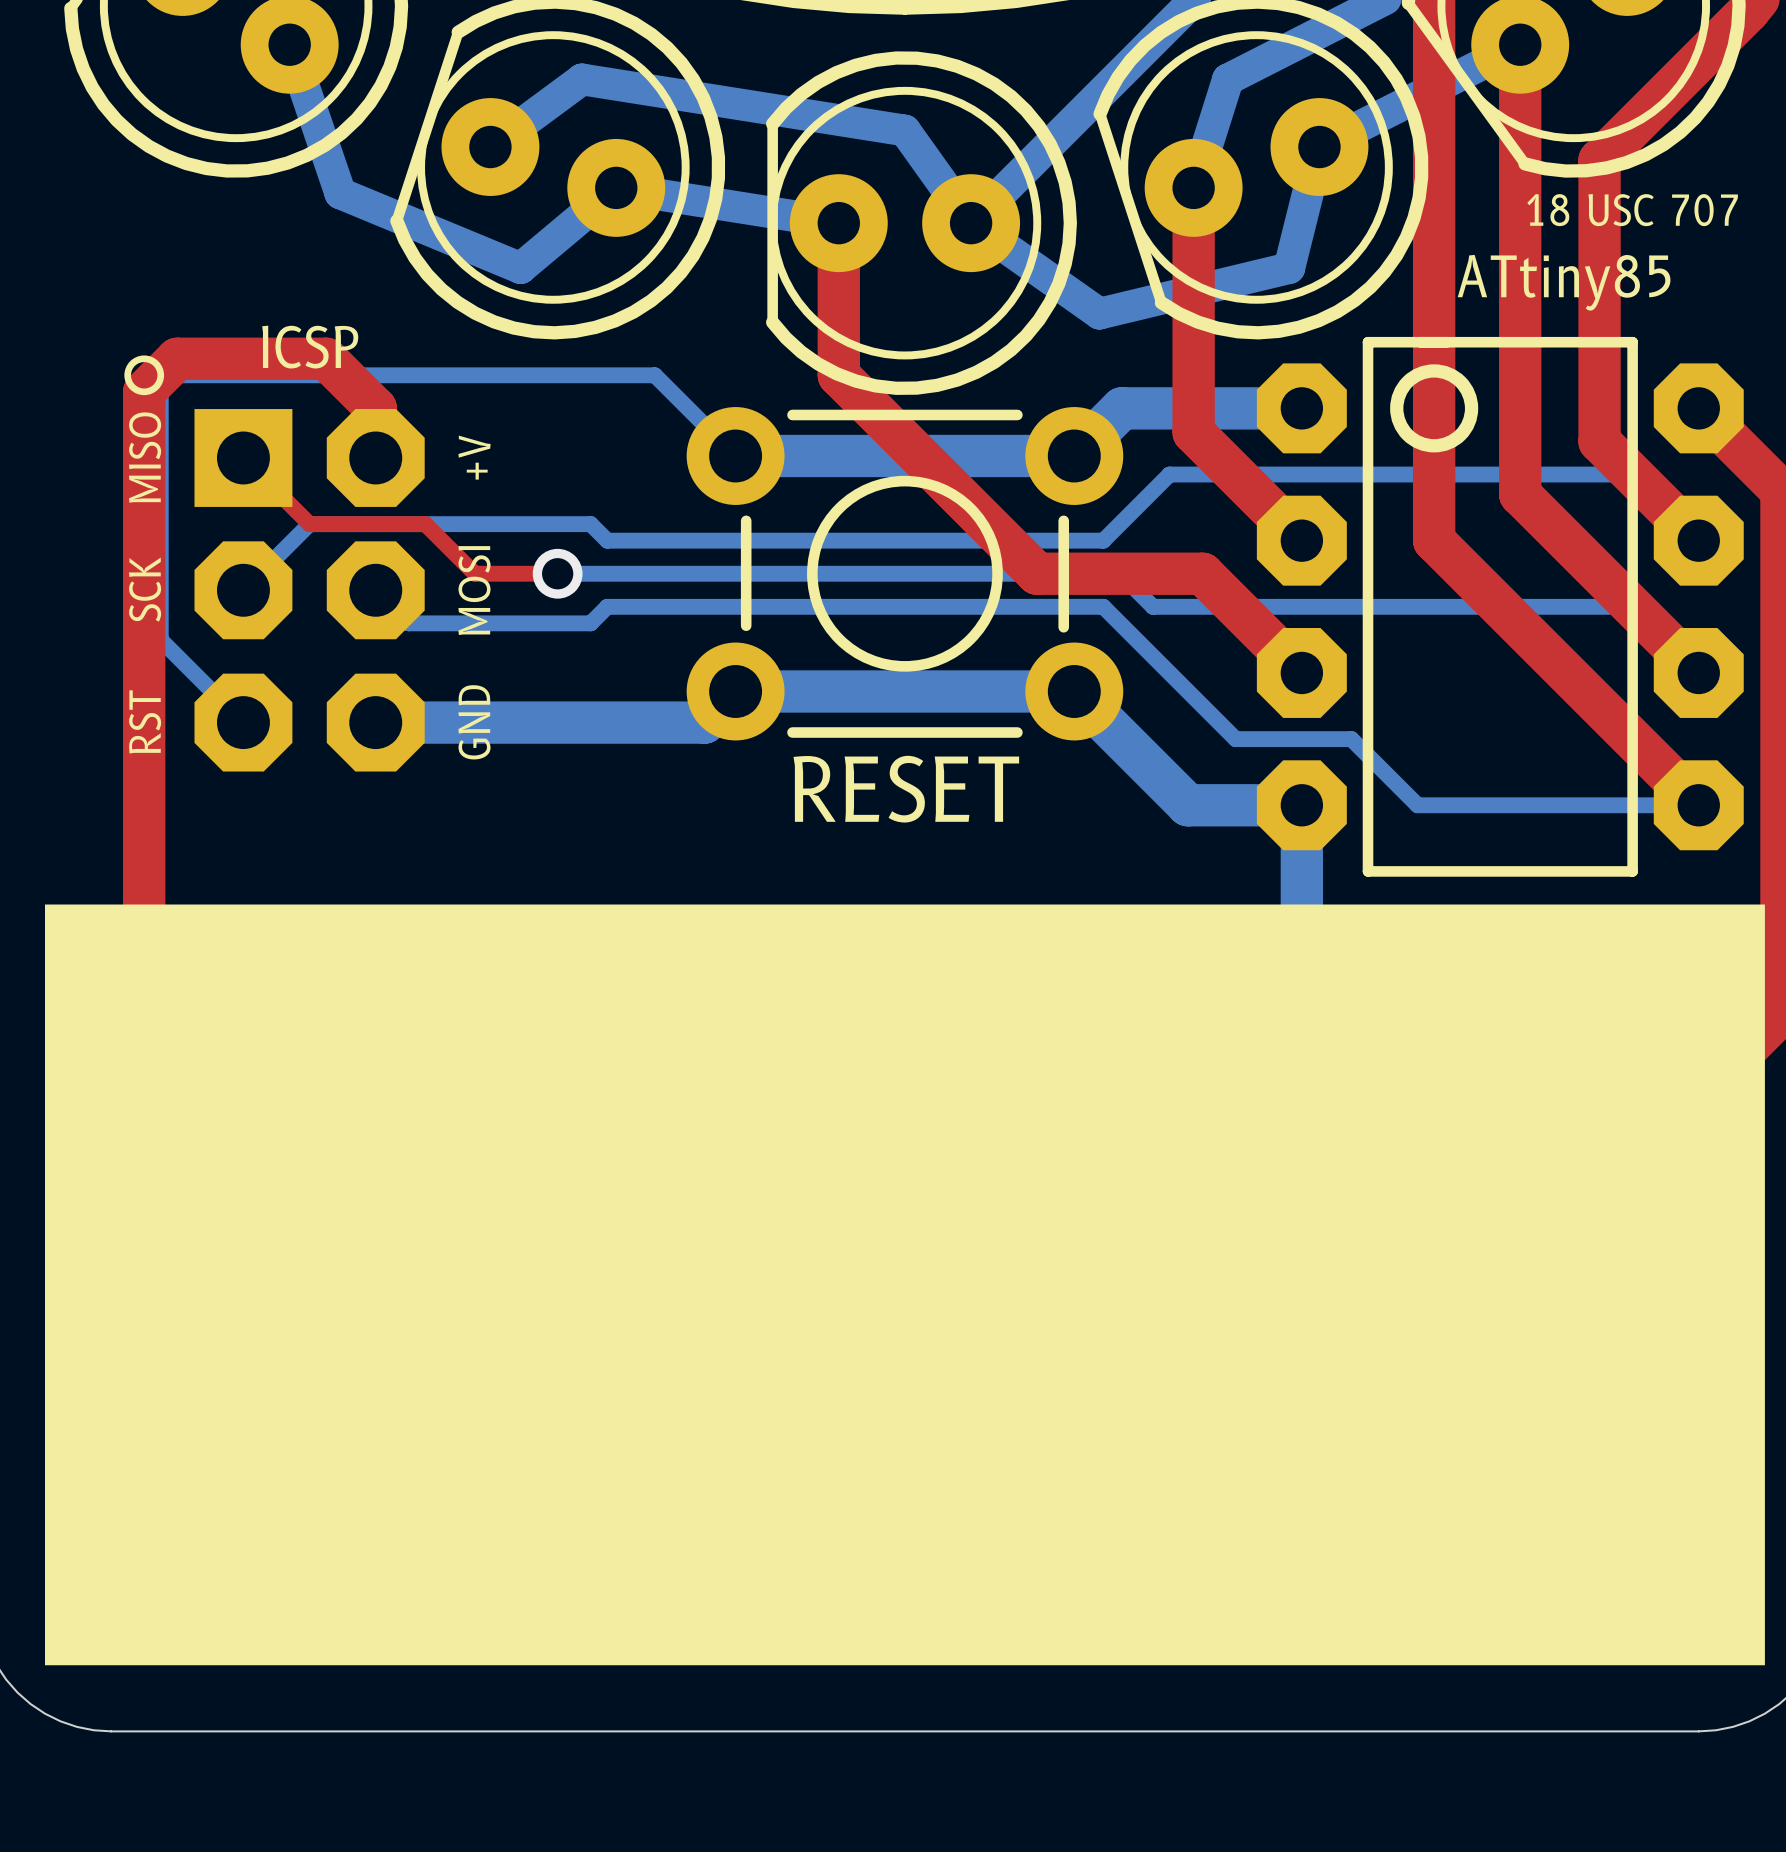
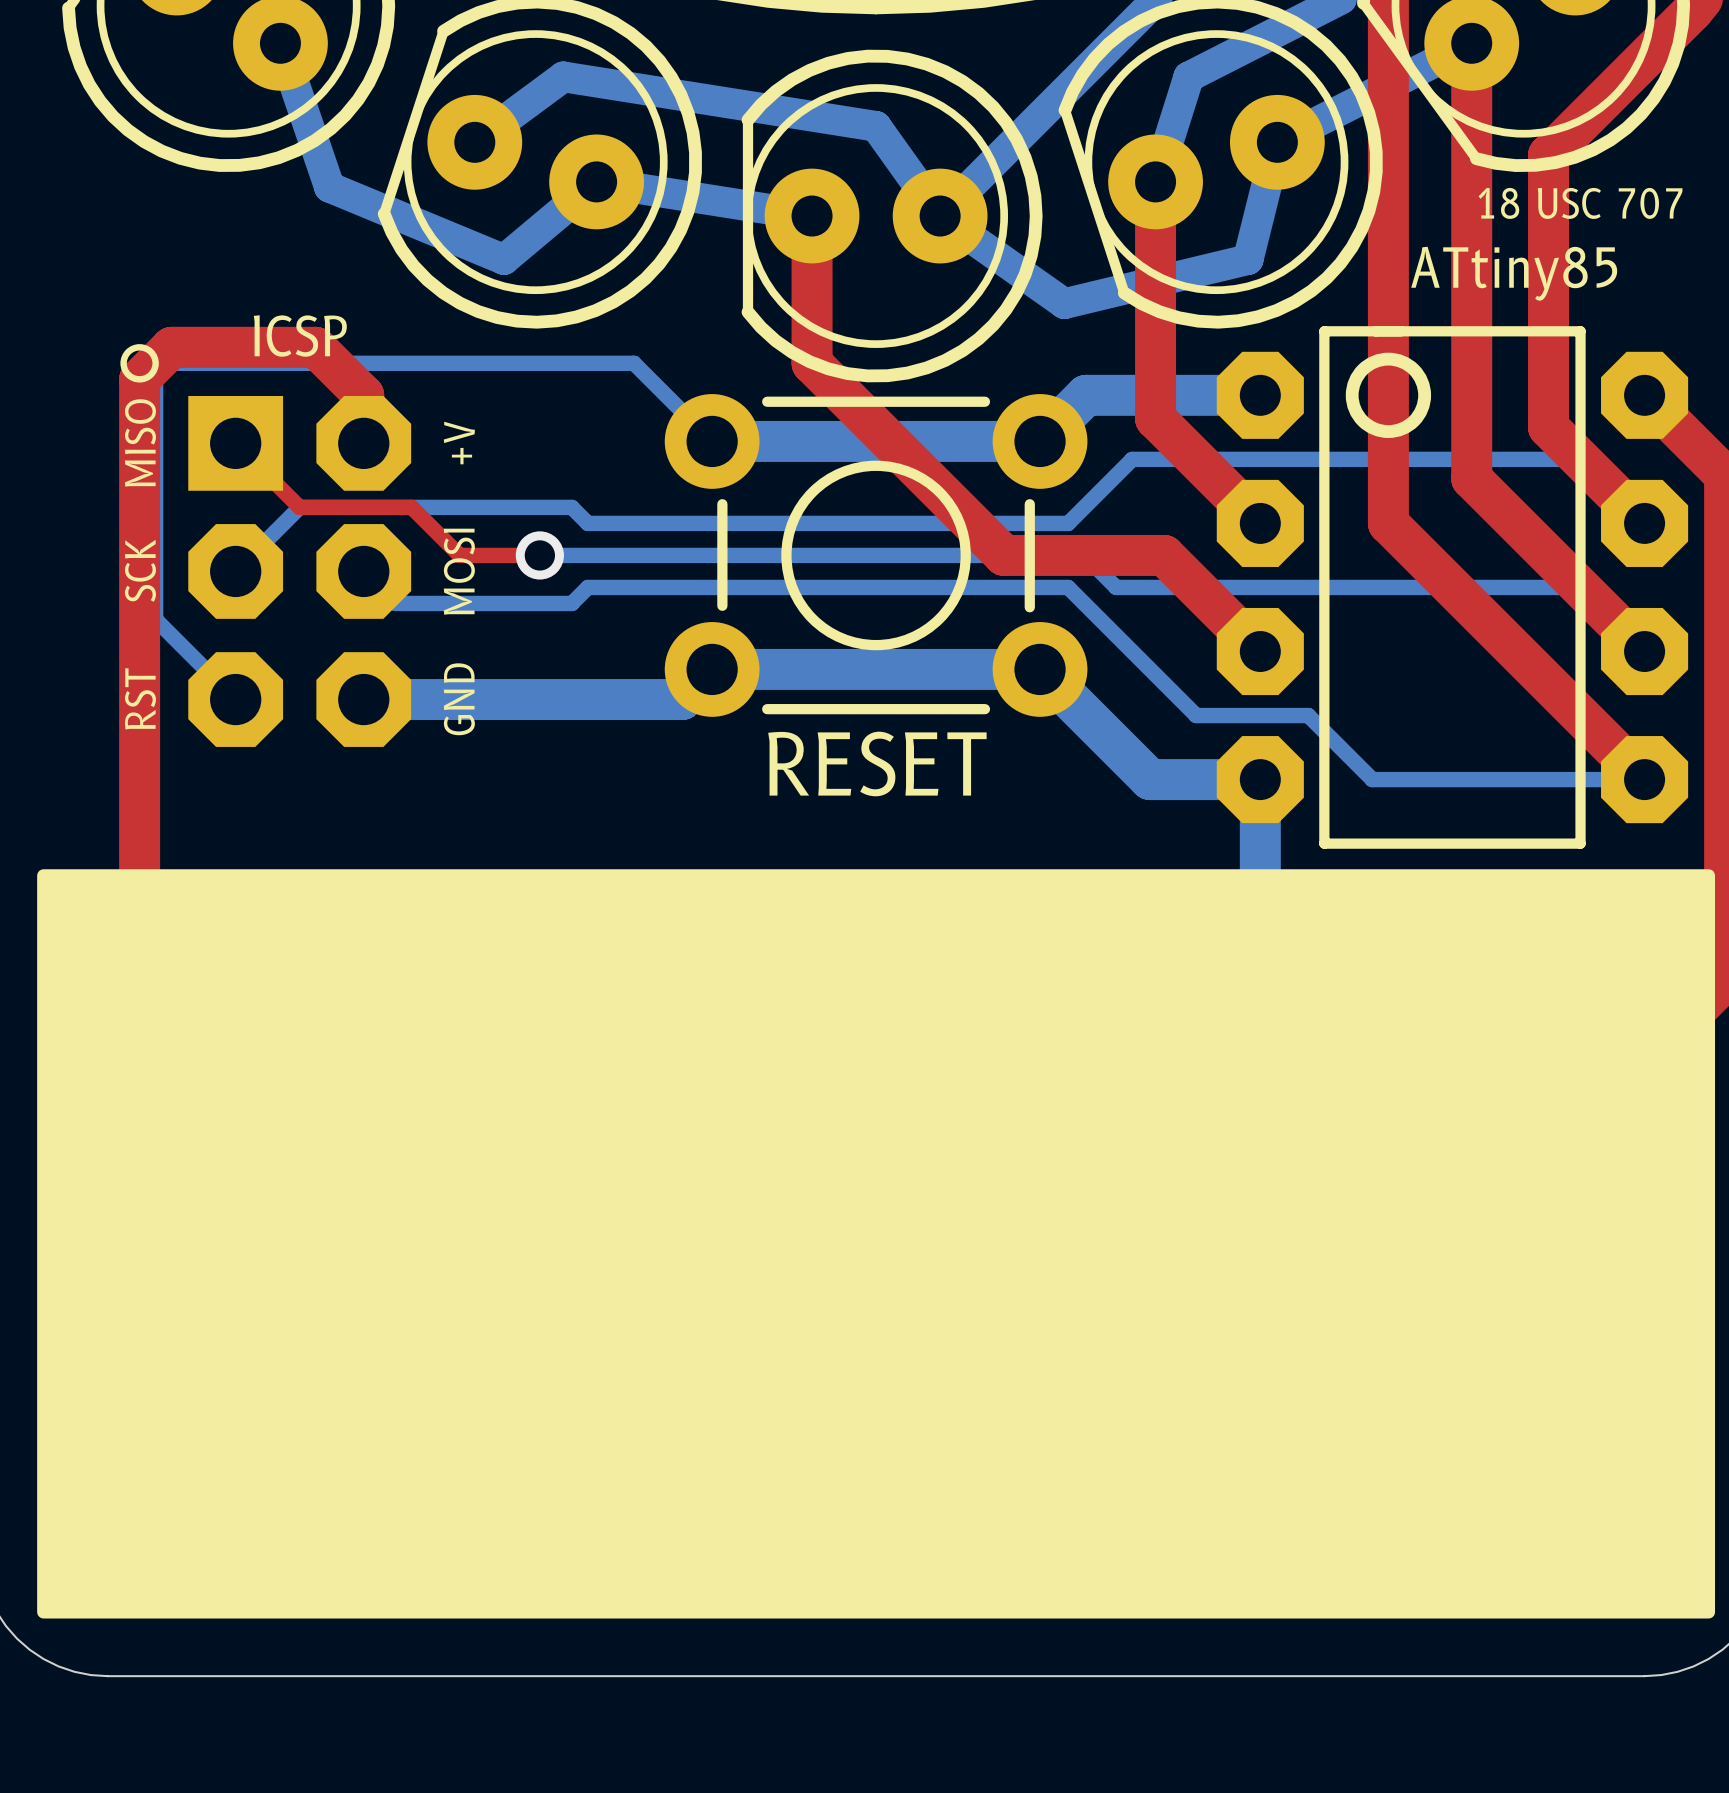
drawing shape: [44, 904, 1765, 1666] -> [37, 869, 1716, 1619]

